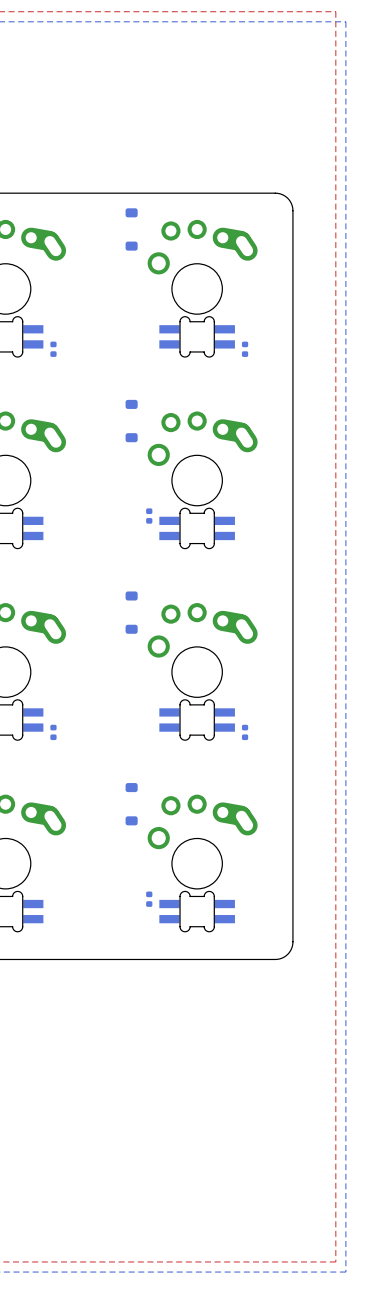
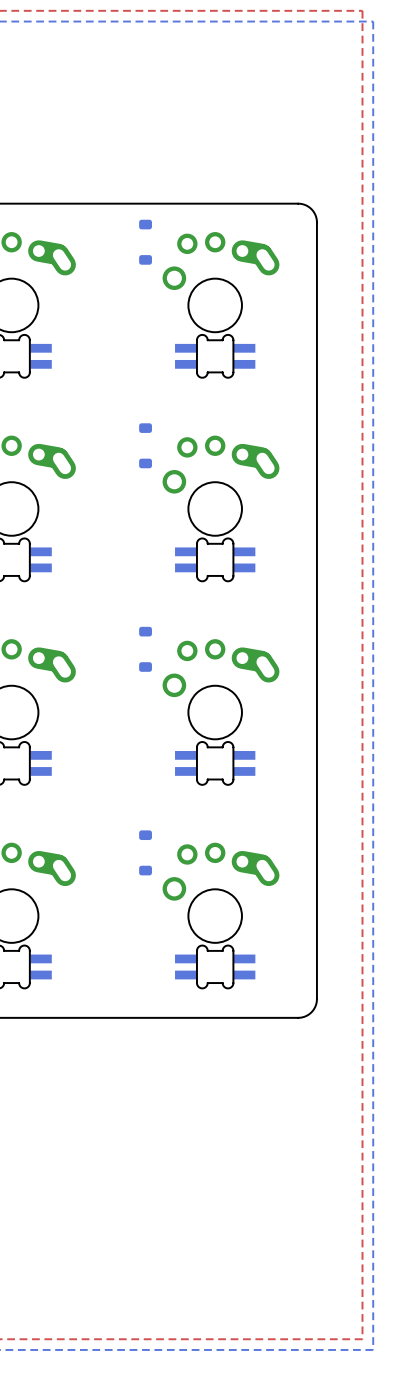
part: (53, 349) -> none
part: (245, 349) -> none
part: (149, 516) -> none
part: (53, 732) -> none
part: (245, 732) -> none
part: (149, 899) -> none

